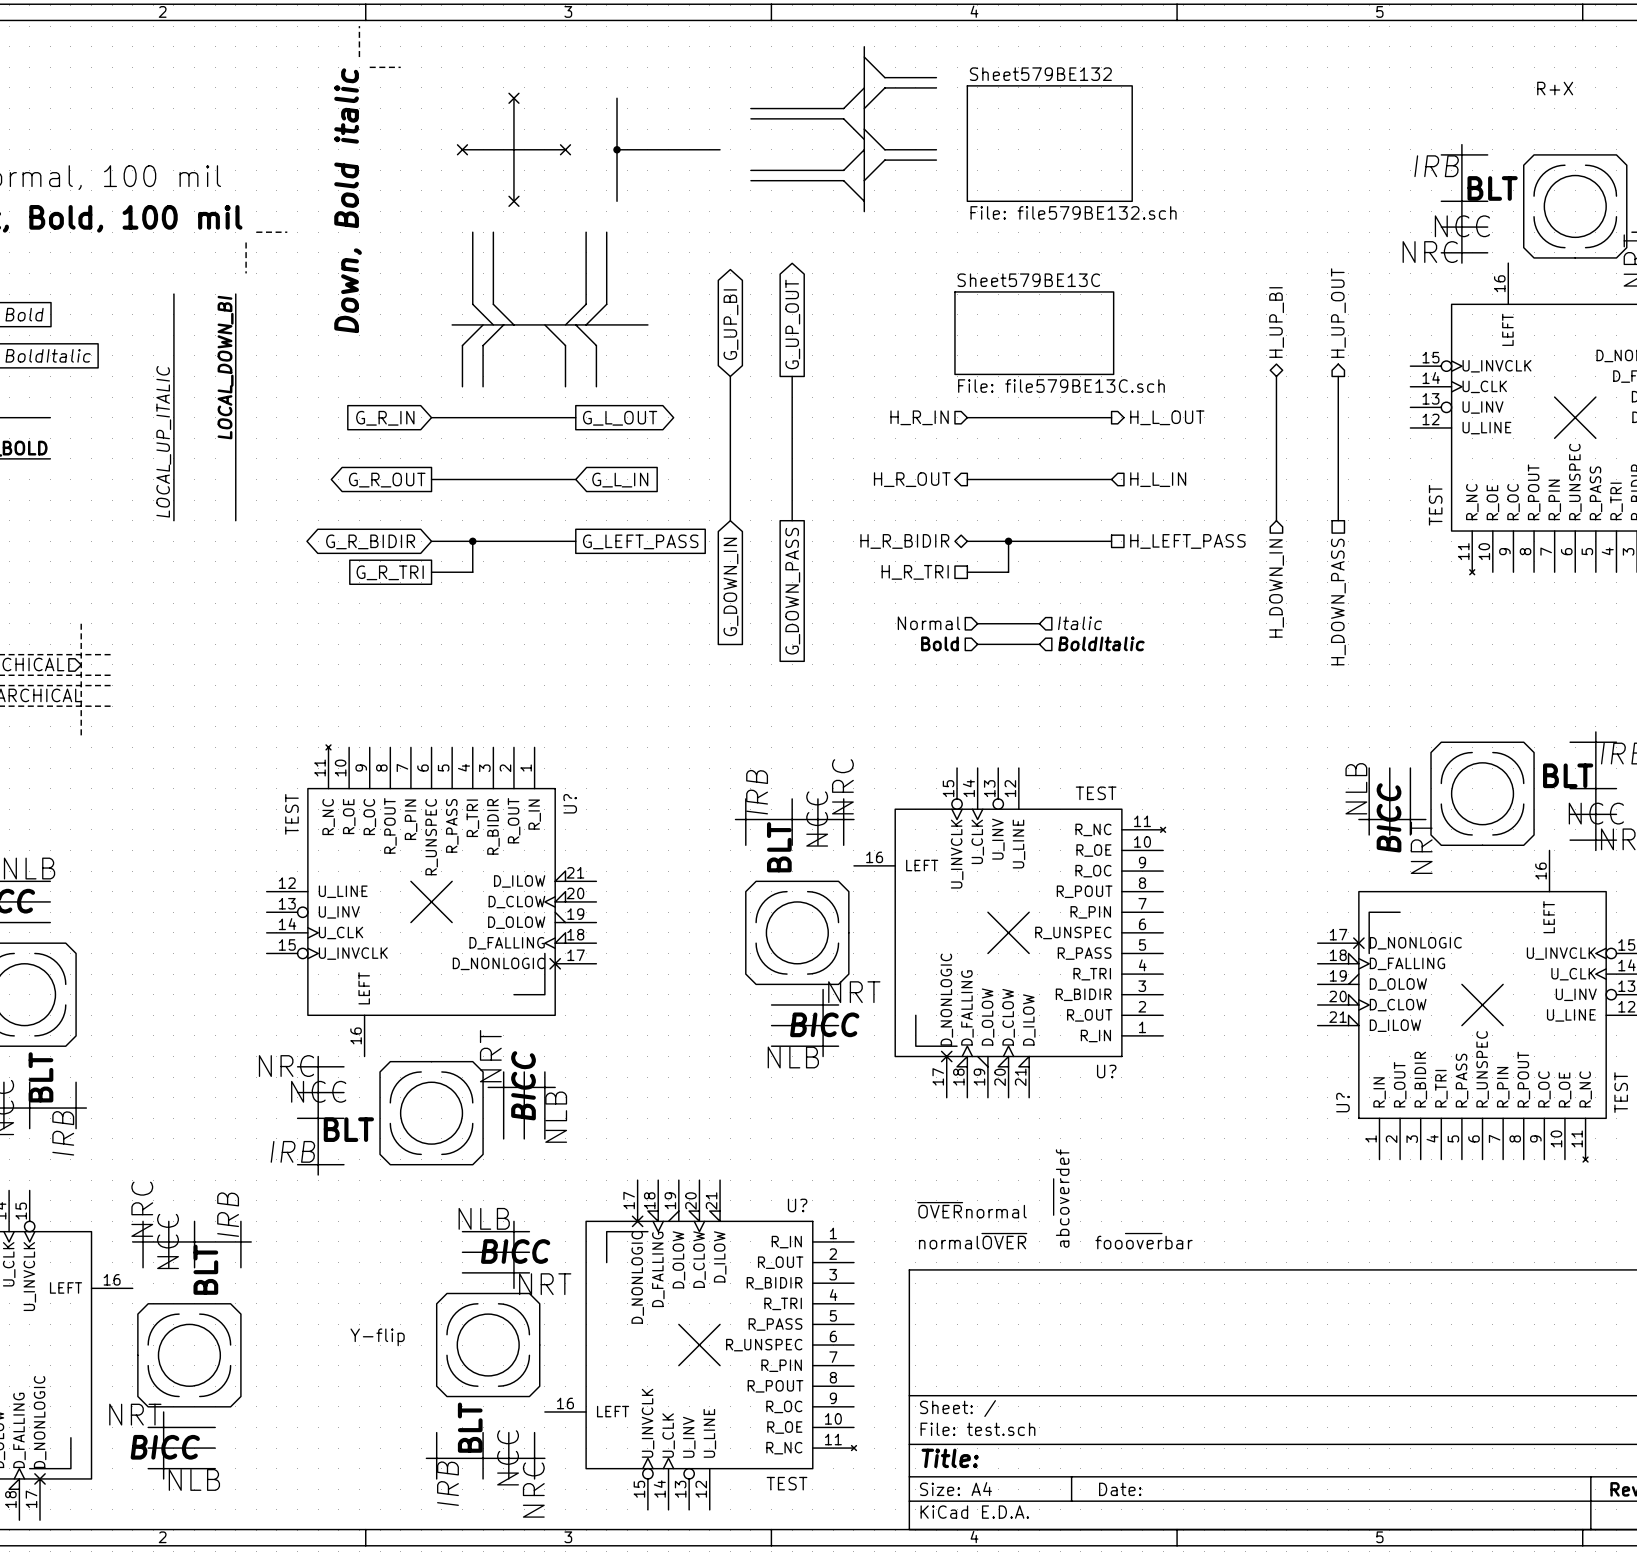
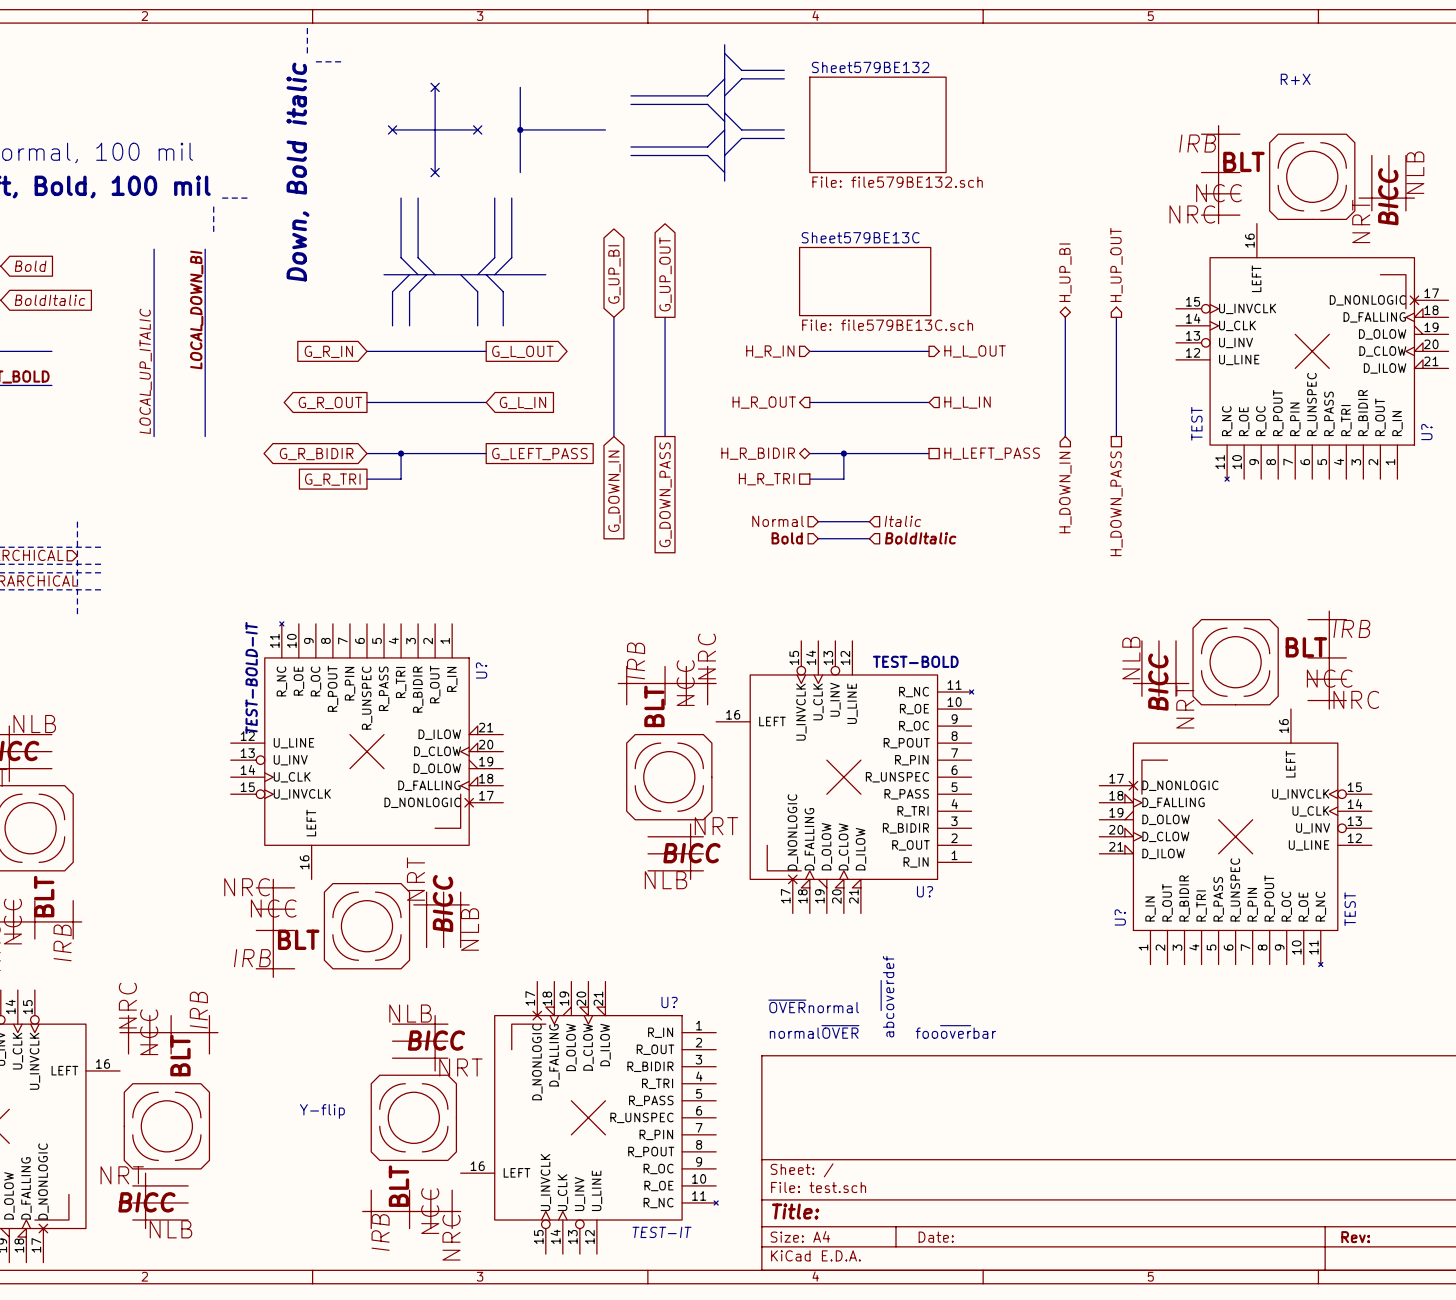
U? value: TEST (1096, 793) -> TEST-BOLD (915, 661)
U? value: TEST (291, 814) -> TEST-BOLD-IT (251, 677)
U? value: TEST (787, 1483) -> TEST-IT (662, 1232)

